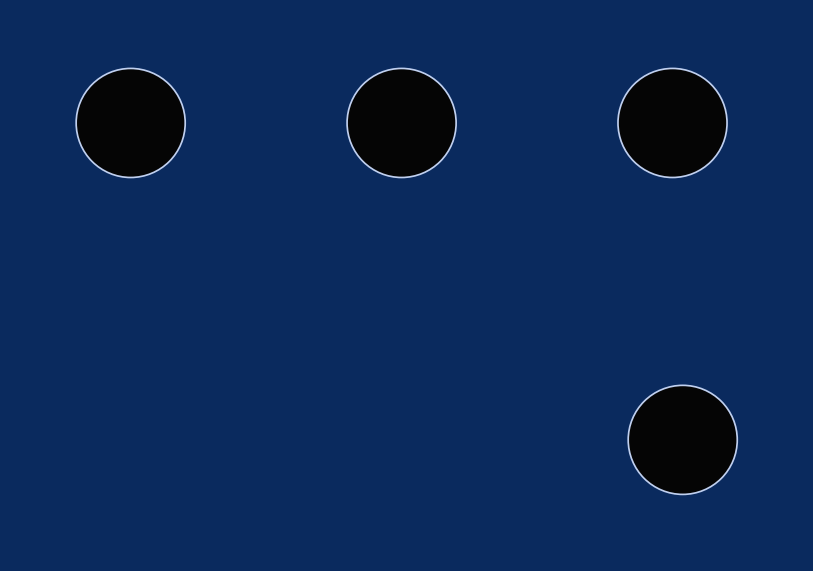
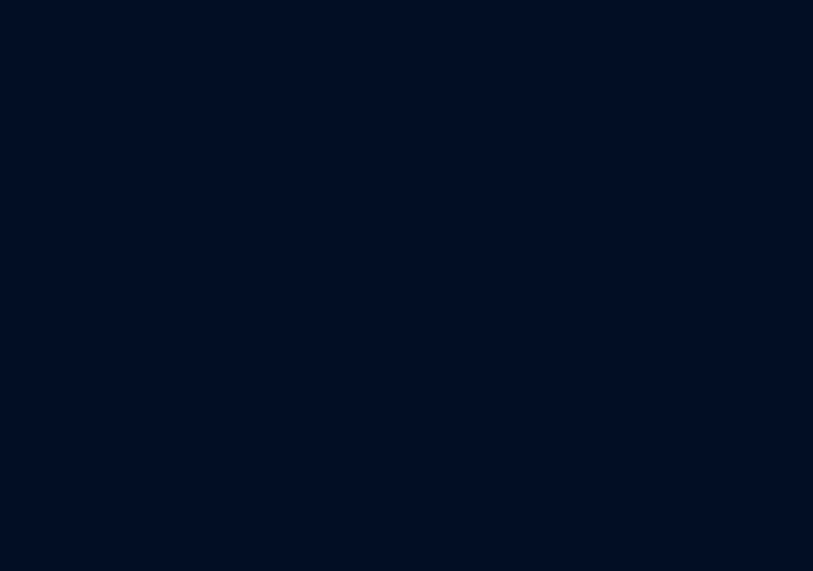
part: (130, 122) -> none
part: (401, 122) -> none
part: (672, 122) -> none
part: (682, 439) -> none

